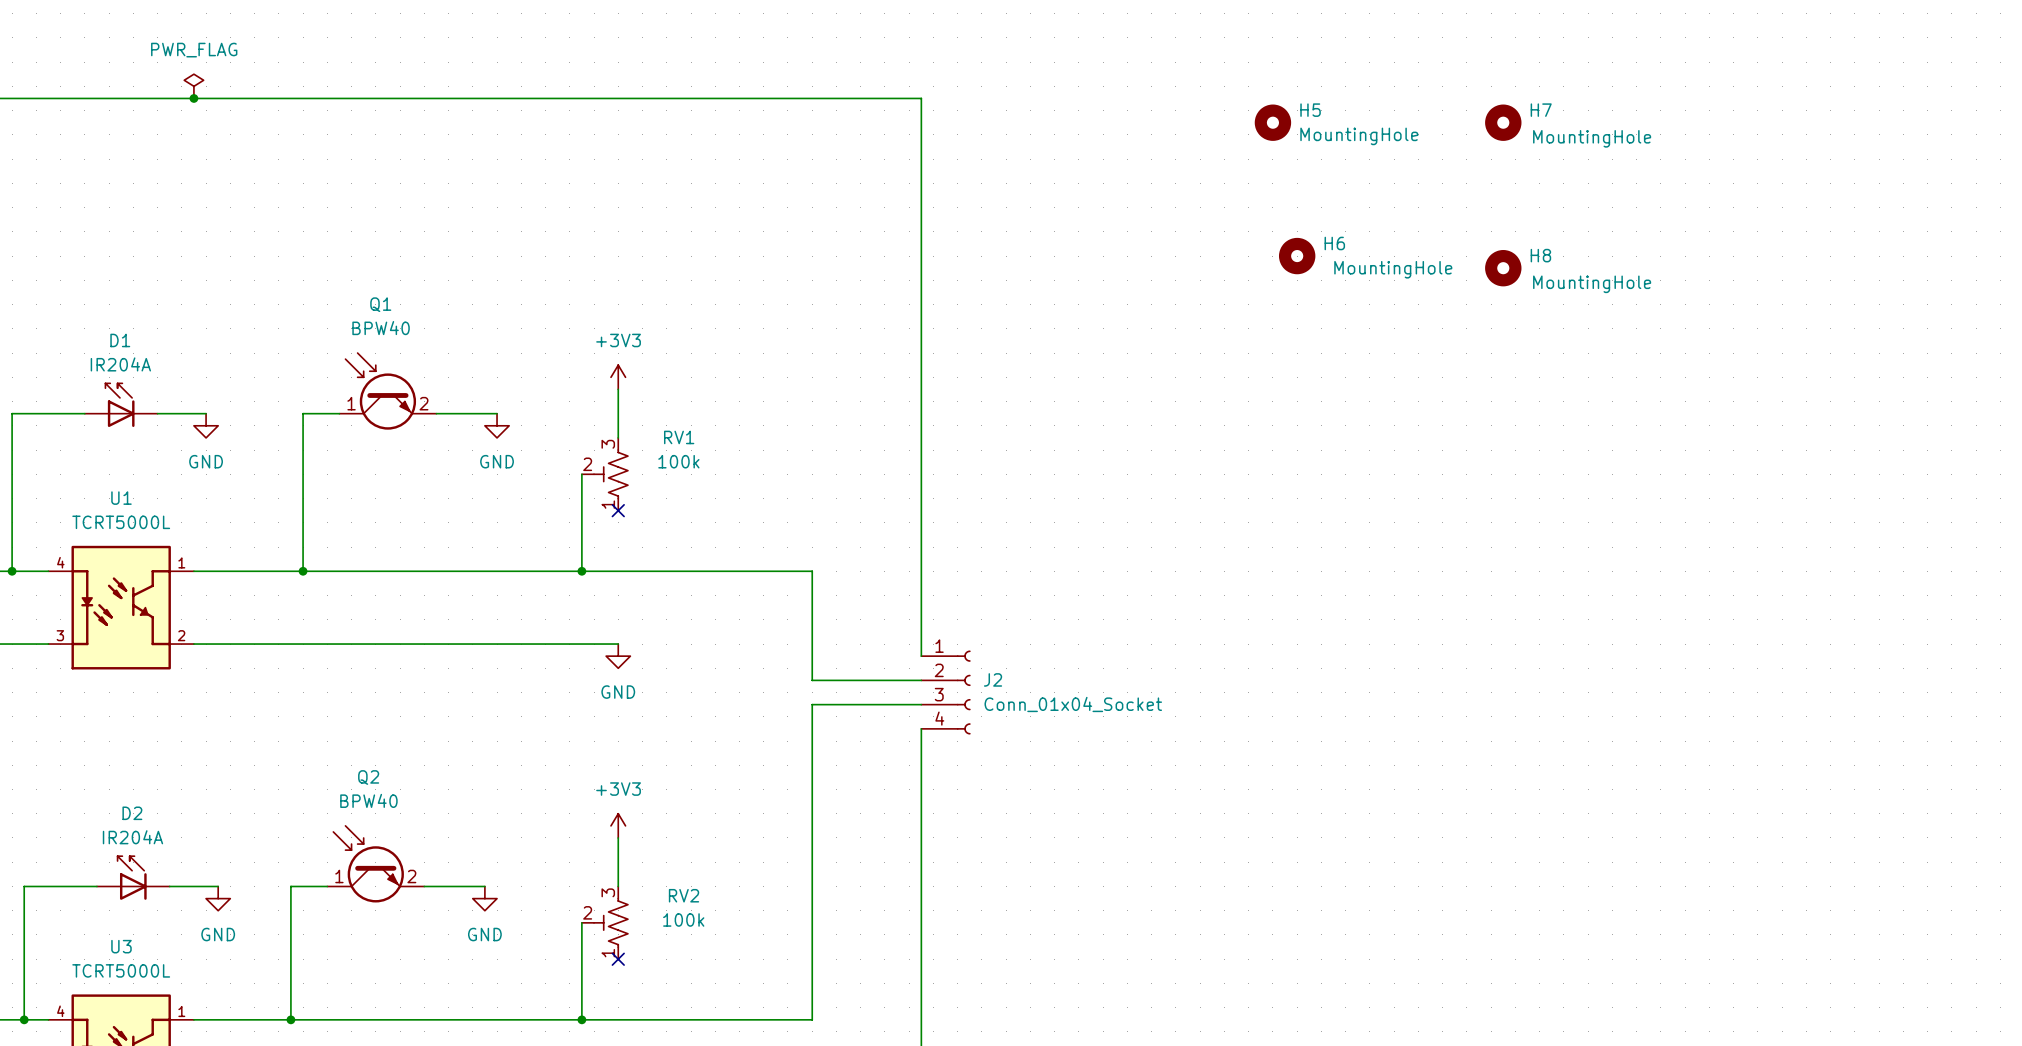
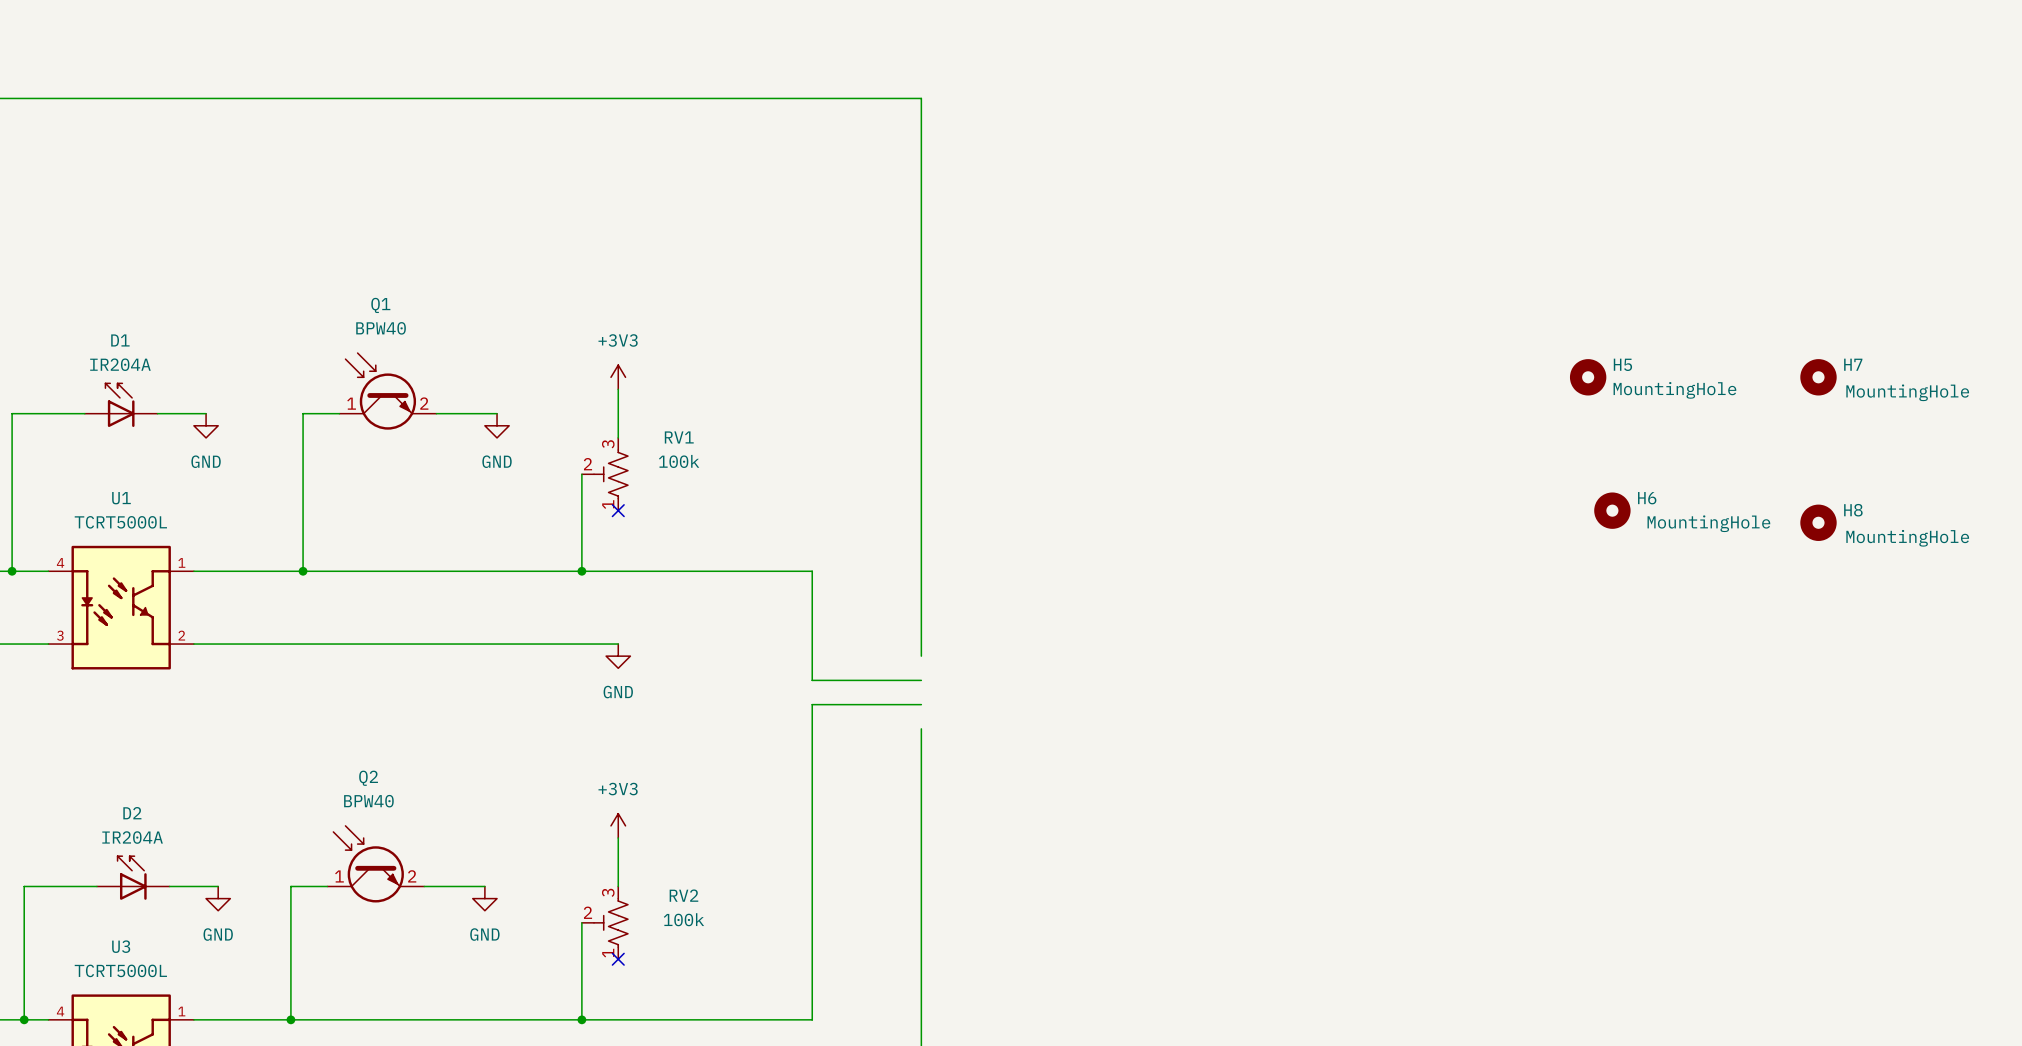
power symbol: PWR_FLAG (193, 86) -> none
junction: (193, 98) -> none
H5 position: (1272, 122) -> (1588, 377)
H7 position: (1503, 122) -> (1818, 377)
H6 position: (1297, 256) -> (1612, 510)
H8 position: (1503, 268) -> (1818, 522)
J2: Conn_01x04_Socket (945, 692) -> none

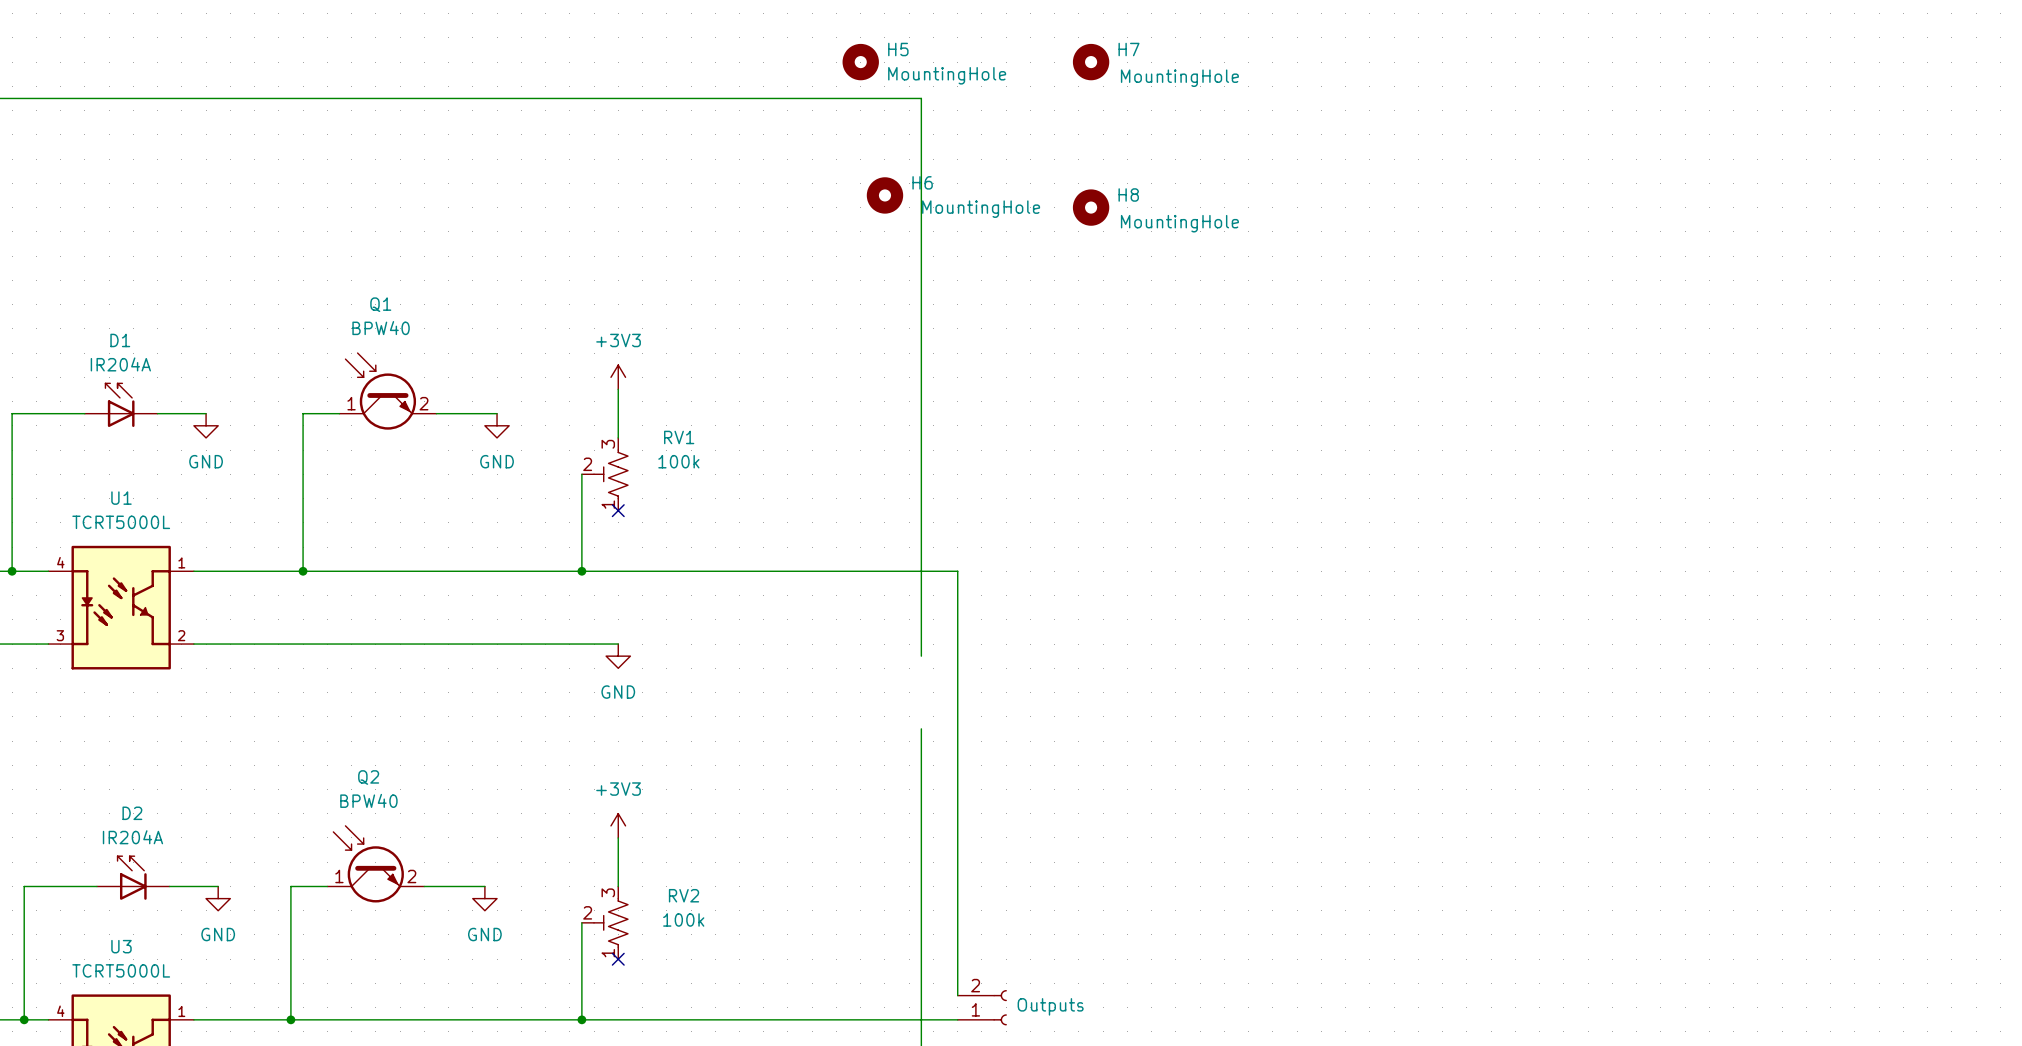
H5 position: (1588, 377) -> (860, 62)
H7 position: (1818, 377) -> (1091, 62)
H6 position: (1612, 510) -> (884, 195)
H8 position: (1818, 522) -> (1091, 207)
wire: (812, 571) (812, 680) (921, 680) -> (812, 571) (957, 571) (957, 995)
wire: (921, 704) (812, 704) (812, 1019) -> (957, 1019) (812, 1019)
part: none -> Outputs (982, 1007)

